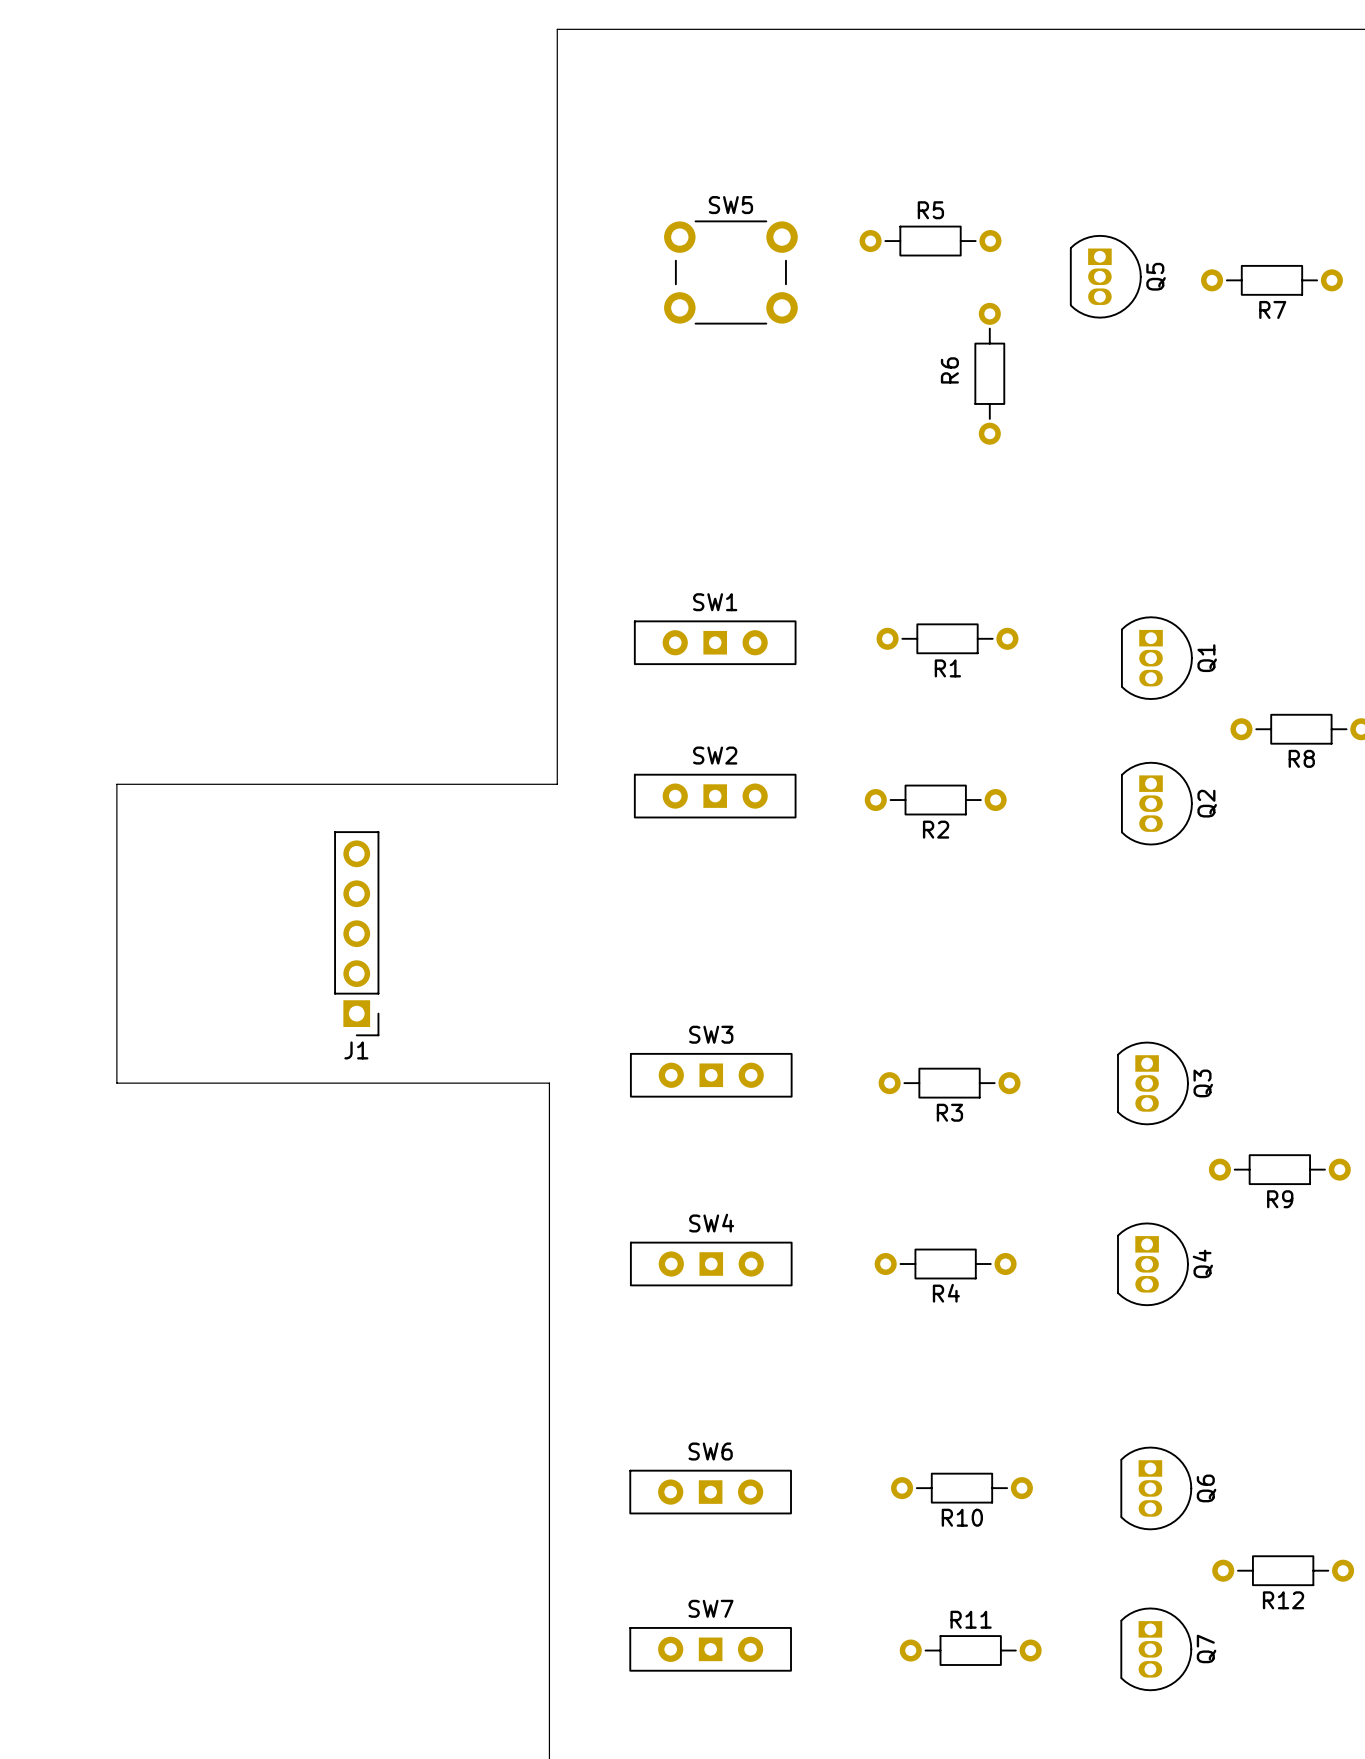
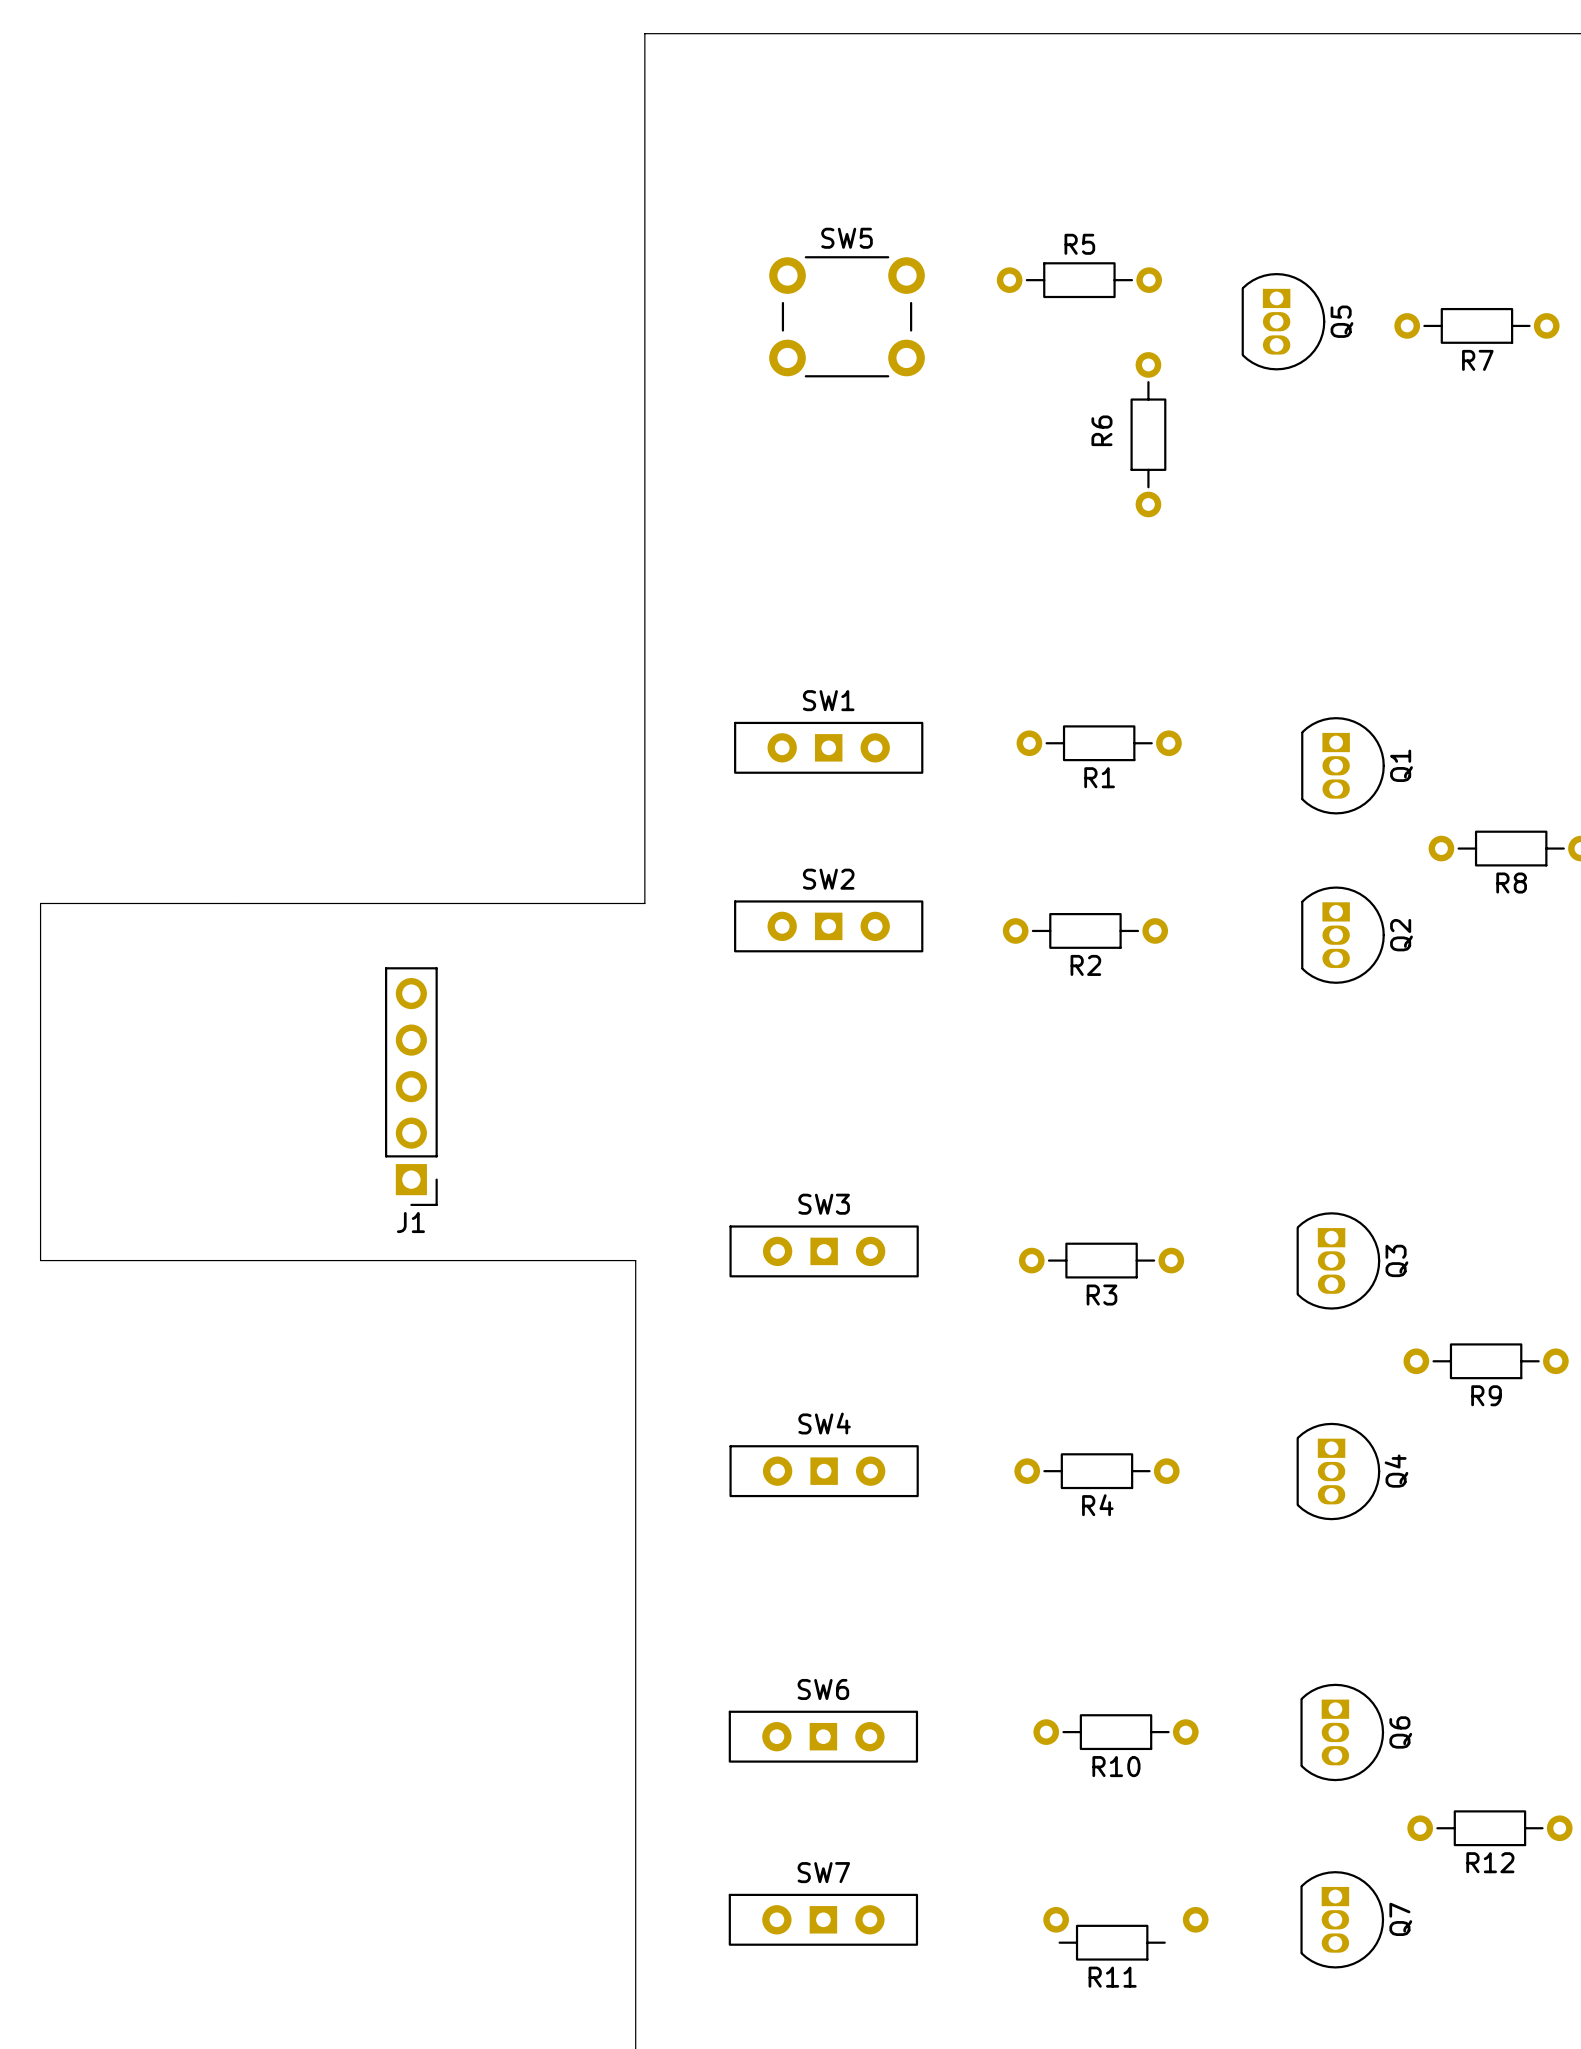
board edge: (557, 776) (557, 784) (116, 784) (116, 1083) -> (644, 903) (40, 903) (40, 1260) (132, 1260)
R11 name position: R11 (971, 1619) -> R11 (1112, 1977)
R11 footprint: [899, 1635, 1042, 1666] -> [1043, 1906, 1209, 1961]

